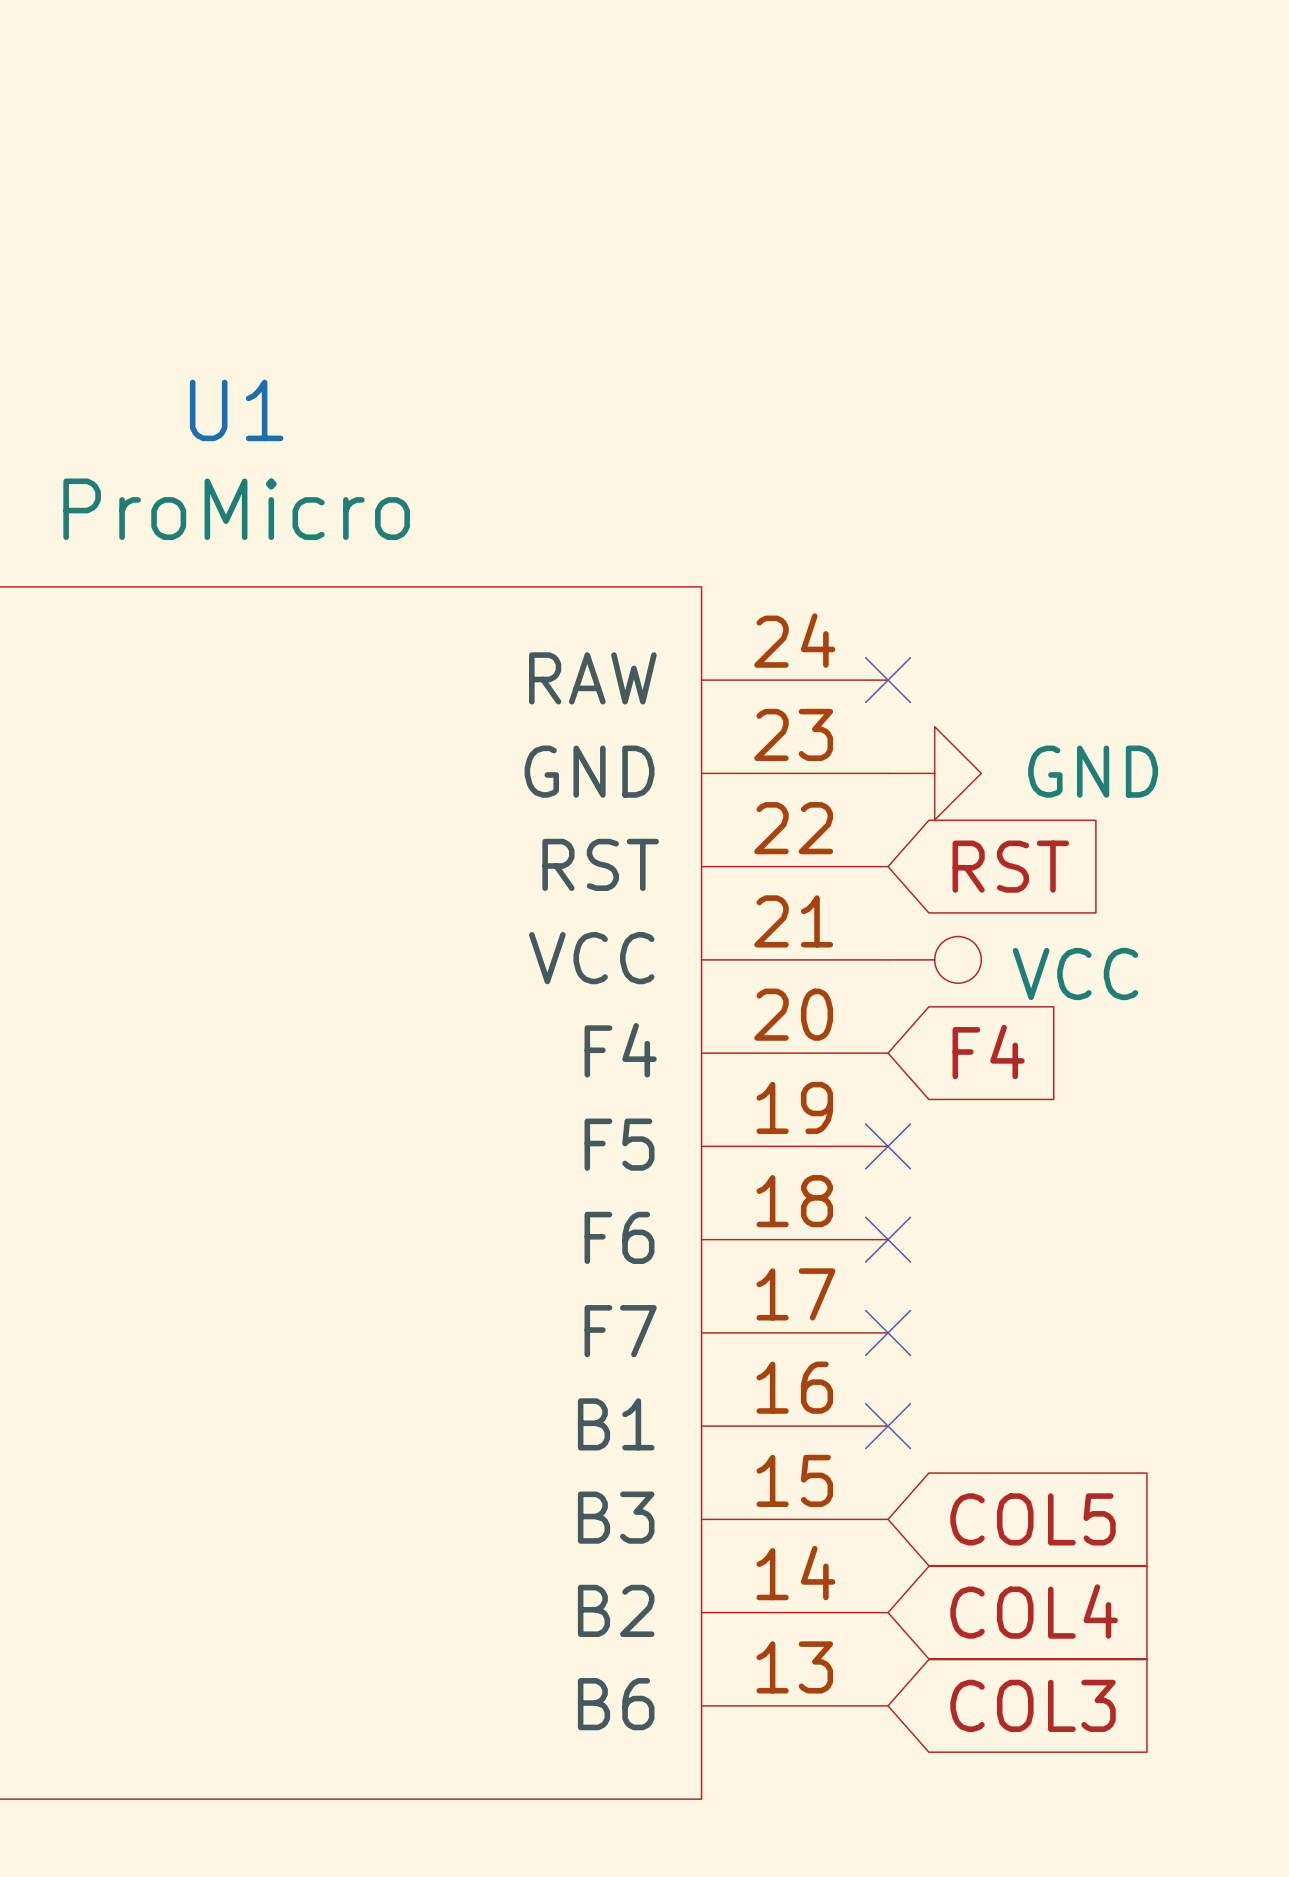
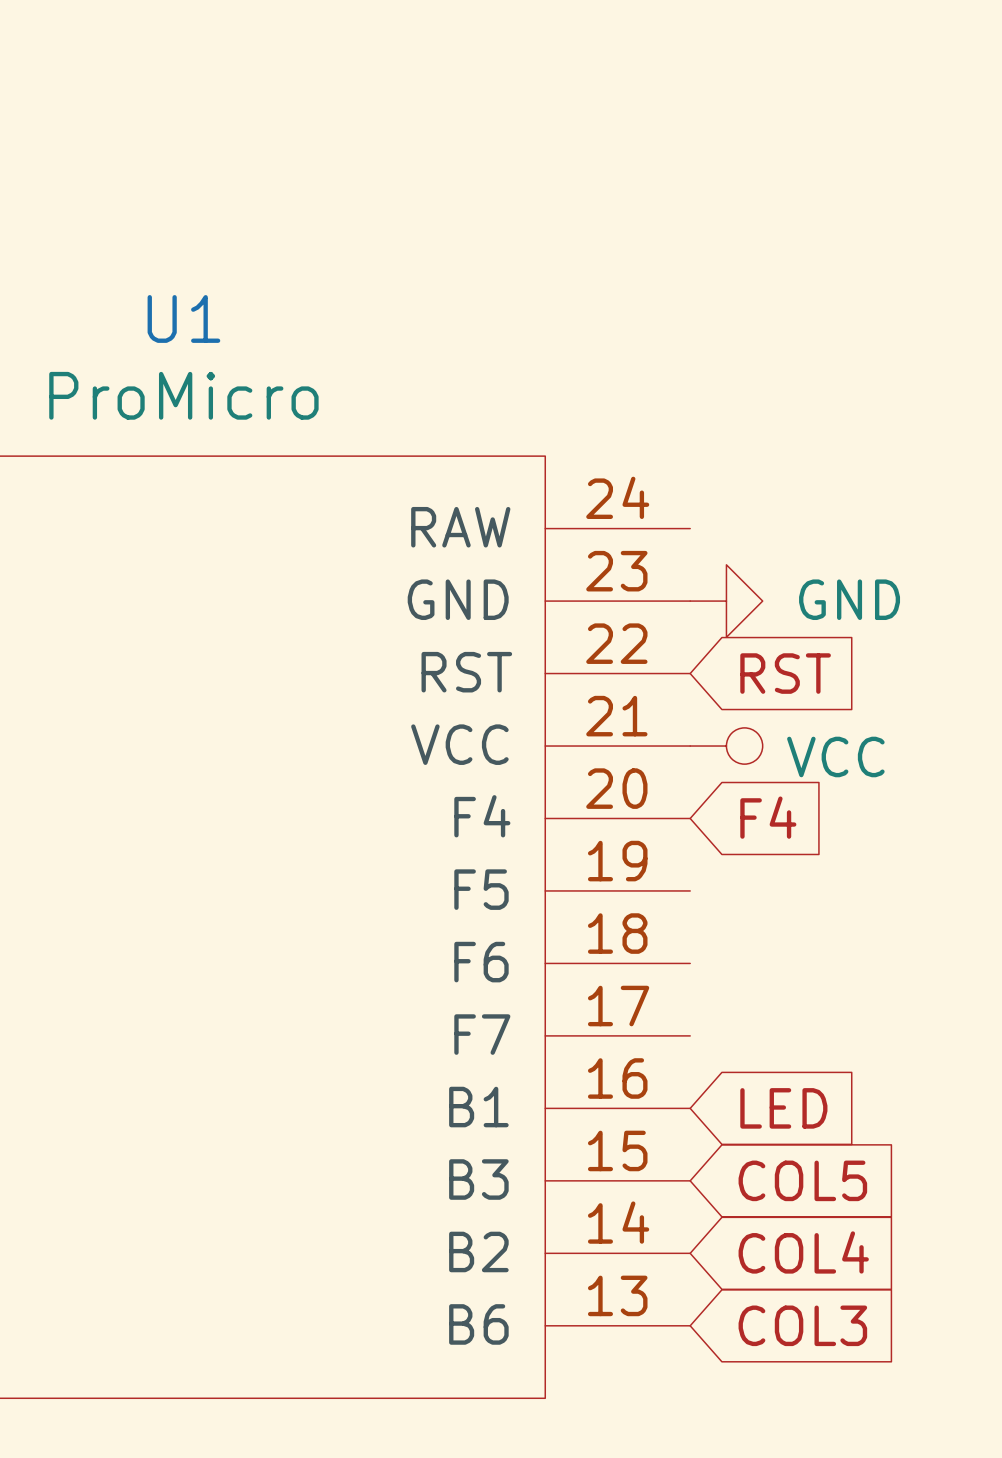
no-connect mark: (888, 680) -> none
no-connect mark: (888, 1146) -> none
no-connect mark: (888, 1239) -> none
no-connect mark: (888, 1332) -> none
no-connect mark: (888, 1426) -> none
global label: none -> LED (783, 1108)

